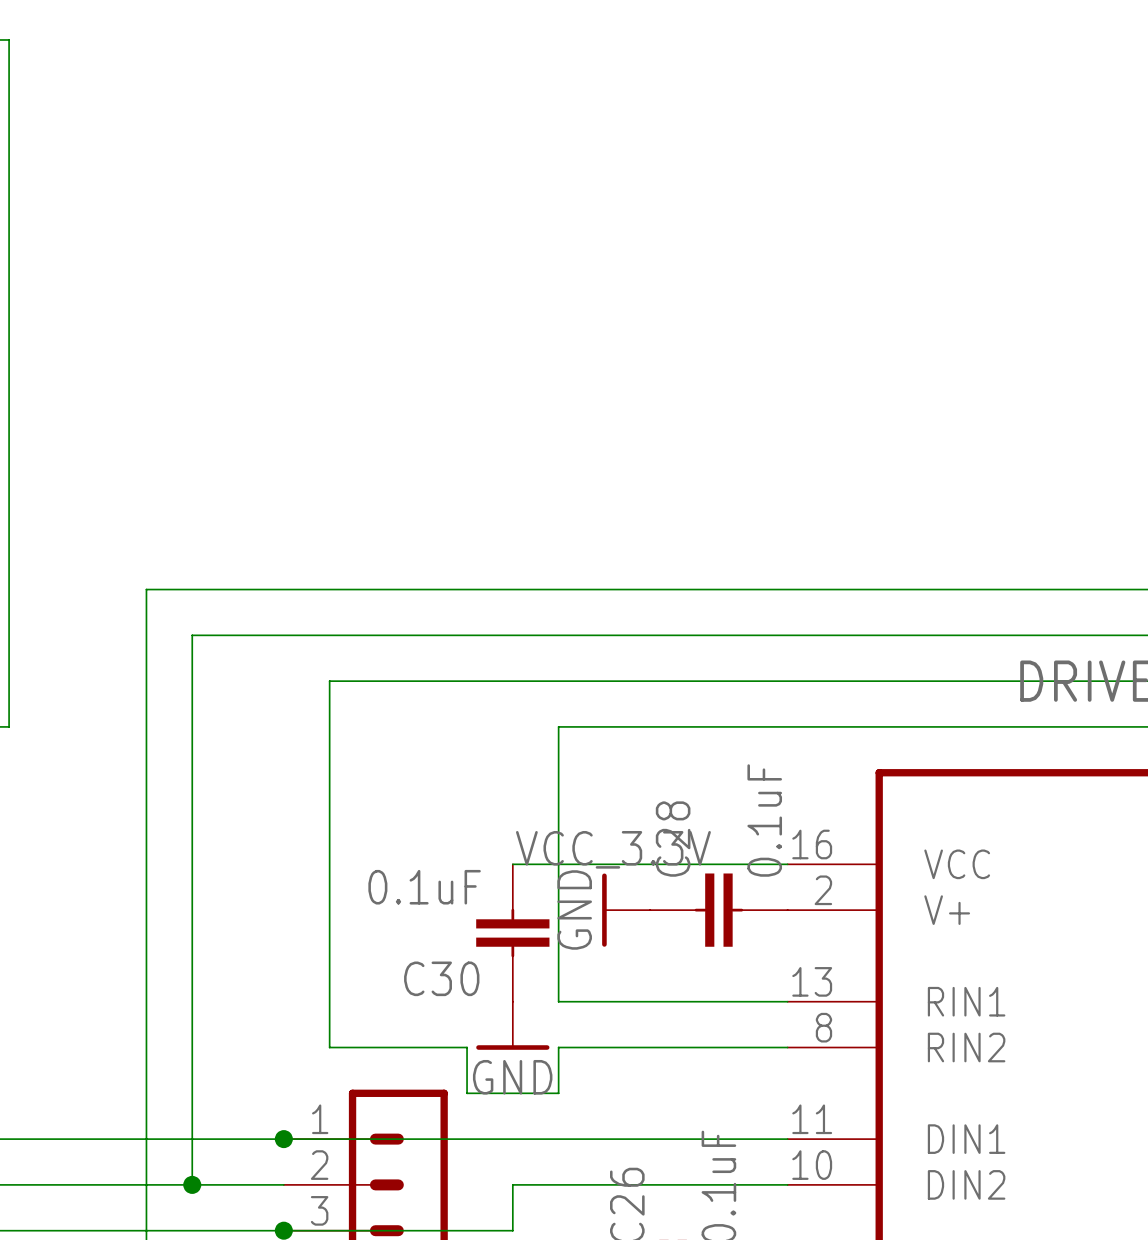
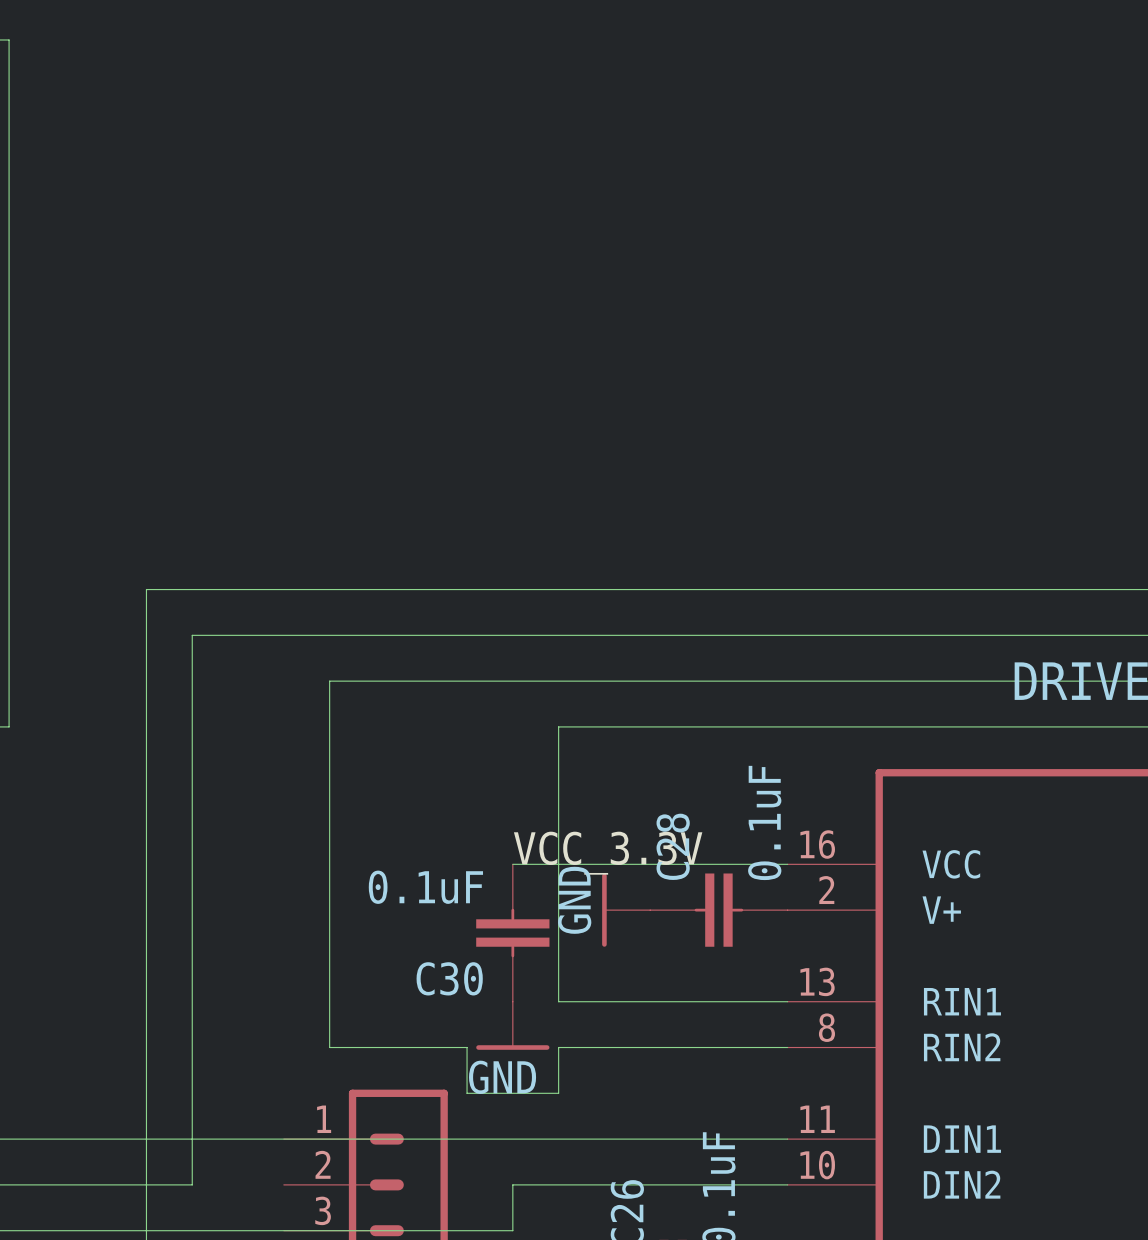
junction: (283, 1139) -> none
wire: (192, 1184) (283, 1184) -> none
junction: (192, 1184) -> none
junction: (283, 1230) -> none

